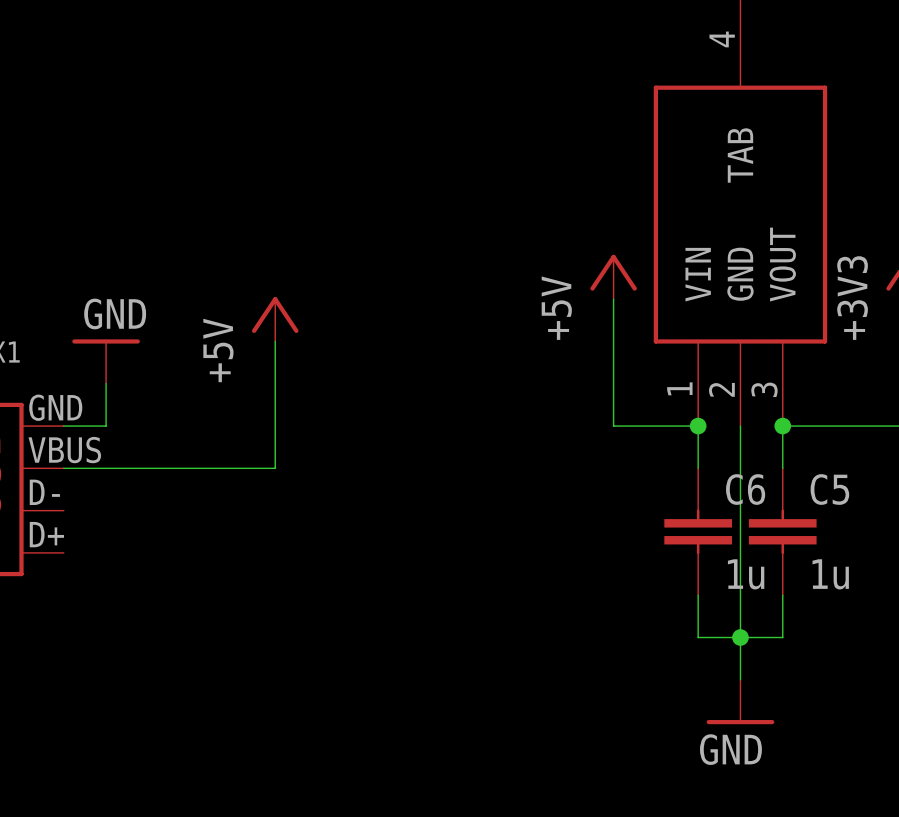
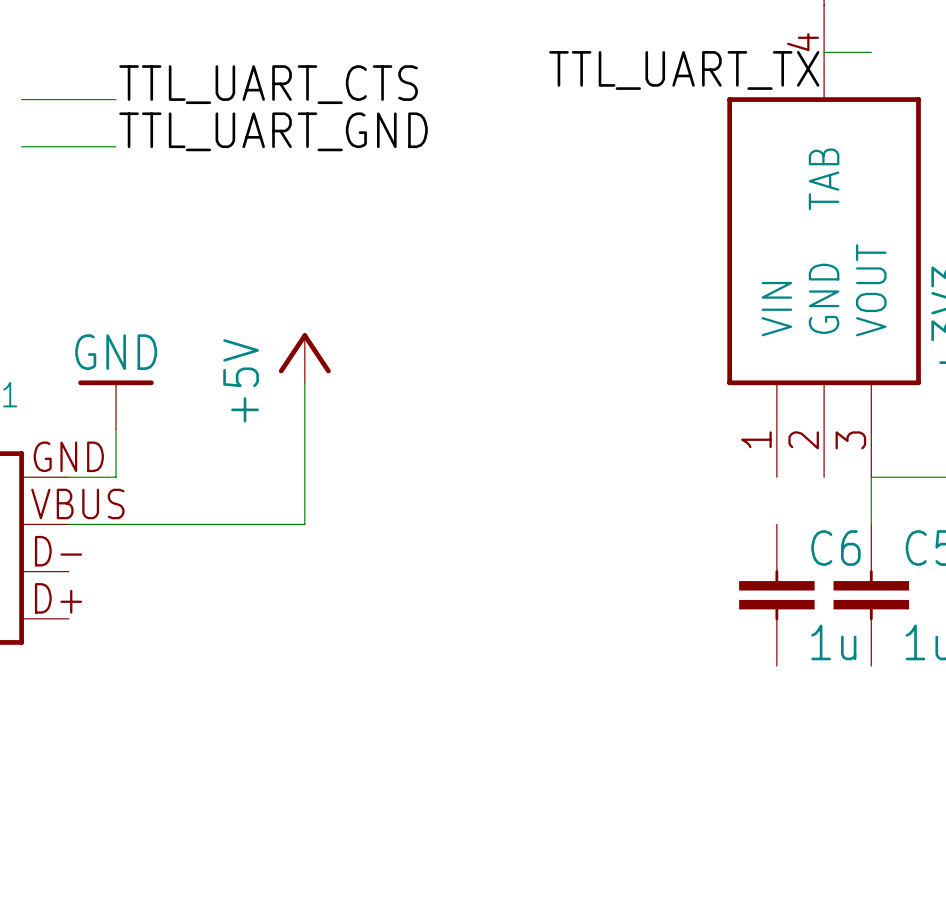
wire: none -> (824, 52) (871, 52)
label: none -> TTL_UART_TX (684, 70)
label: none -> TTL_UART_CTS (268, 84)
wire: none -> (21, 99) (116, 99)
label: none -> TTL_UART_GND (273, 131)
wire: none -> (21, 146) (116, 146)
power symbol: +5V (613, 276) -> none
wire: (613, 299) (613, 426) (698, 426) (698, 468) -> none
junction: (698, 426) -> none
wire: (740, 426) (740, 679) -> none
junction: (782, 426) -> none
wire: (698, 595) (698, 637) (782, 637) (782, 595) -> none
junction: (740, 637) -> none
power symbol: GND (740, 702) -> none

